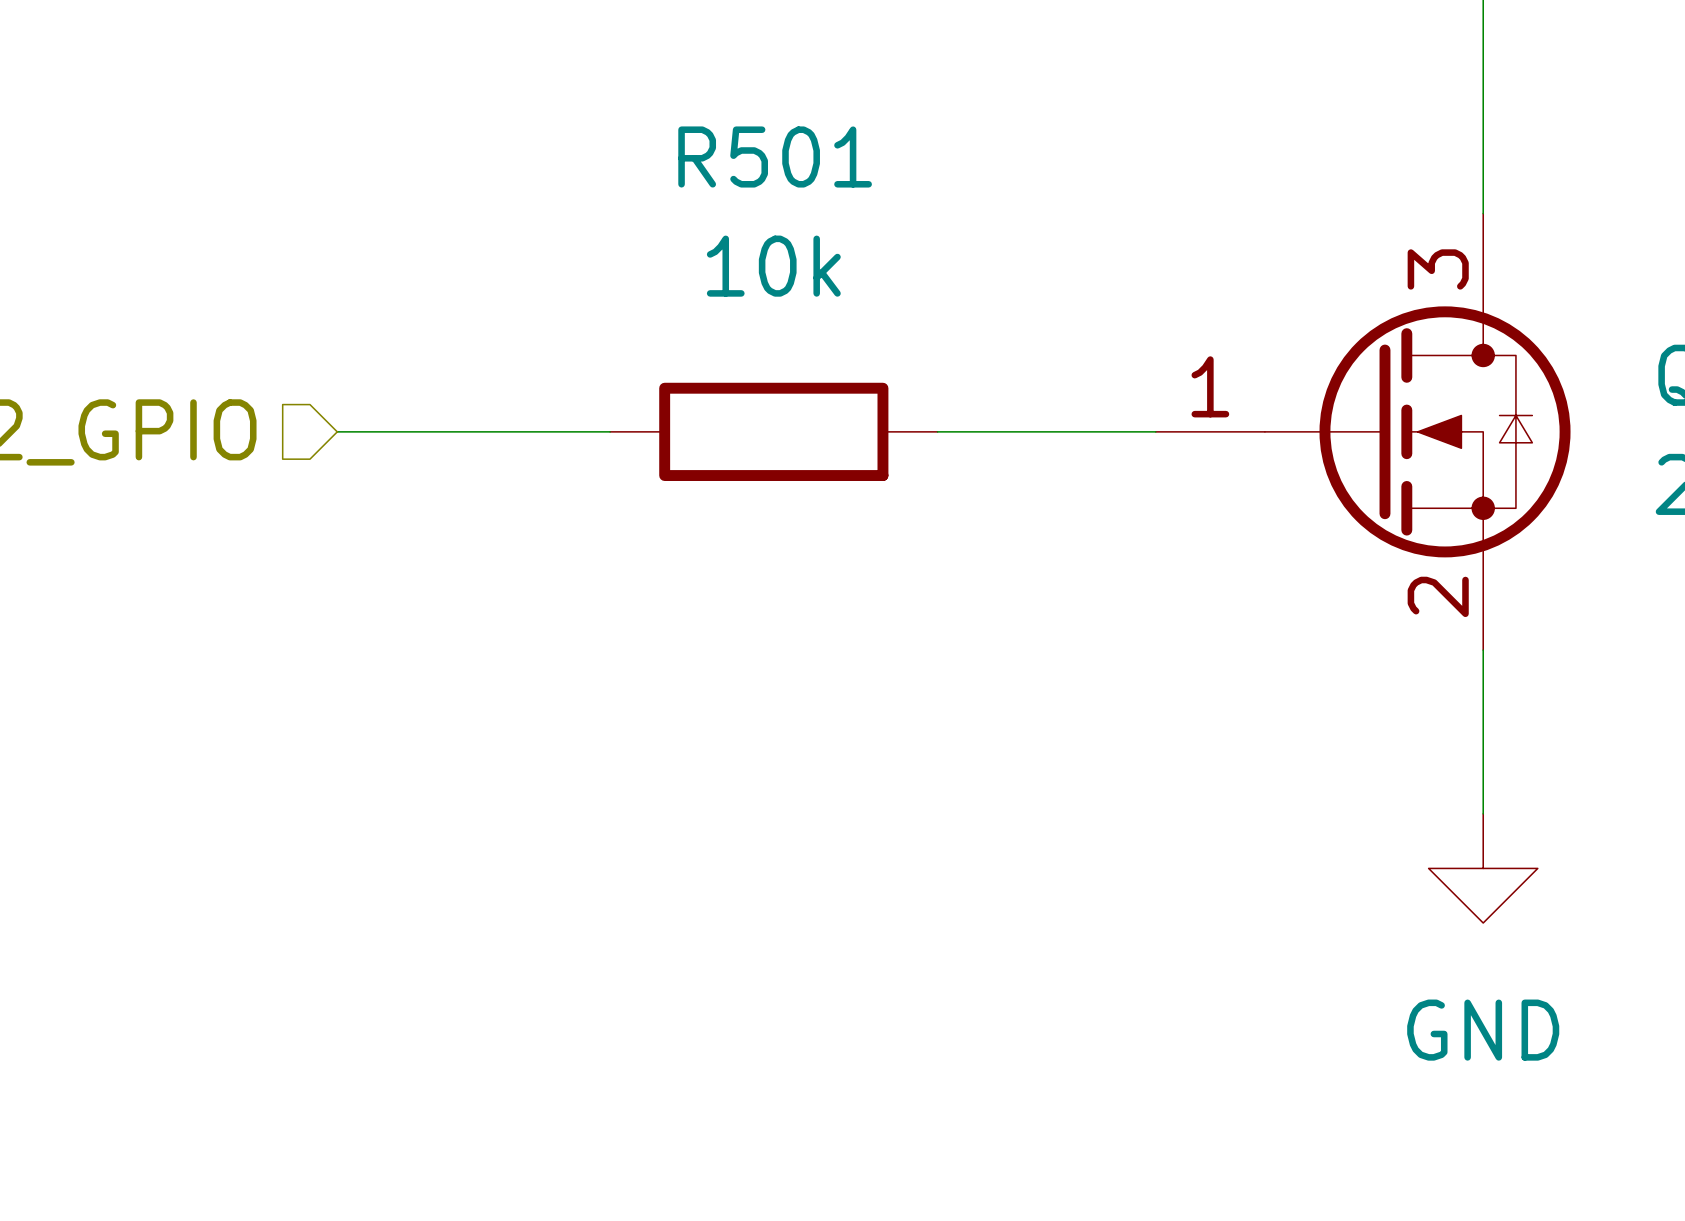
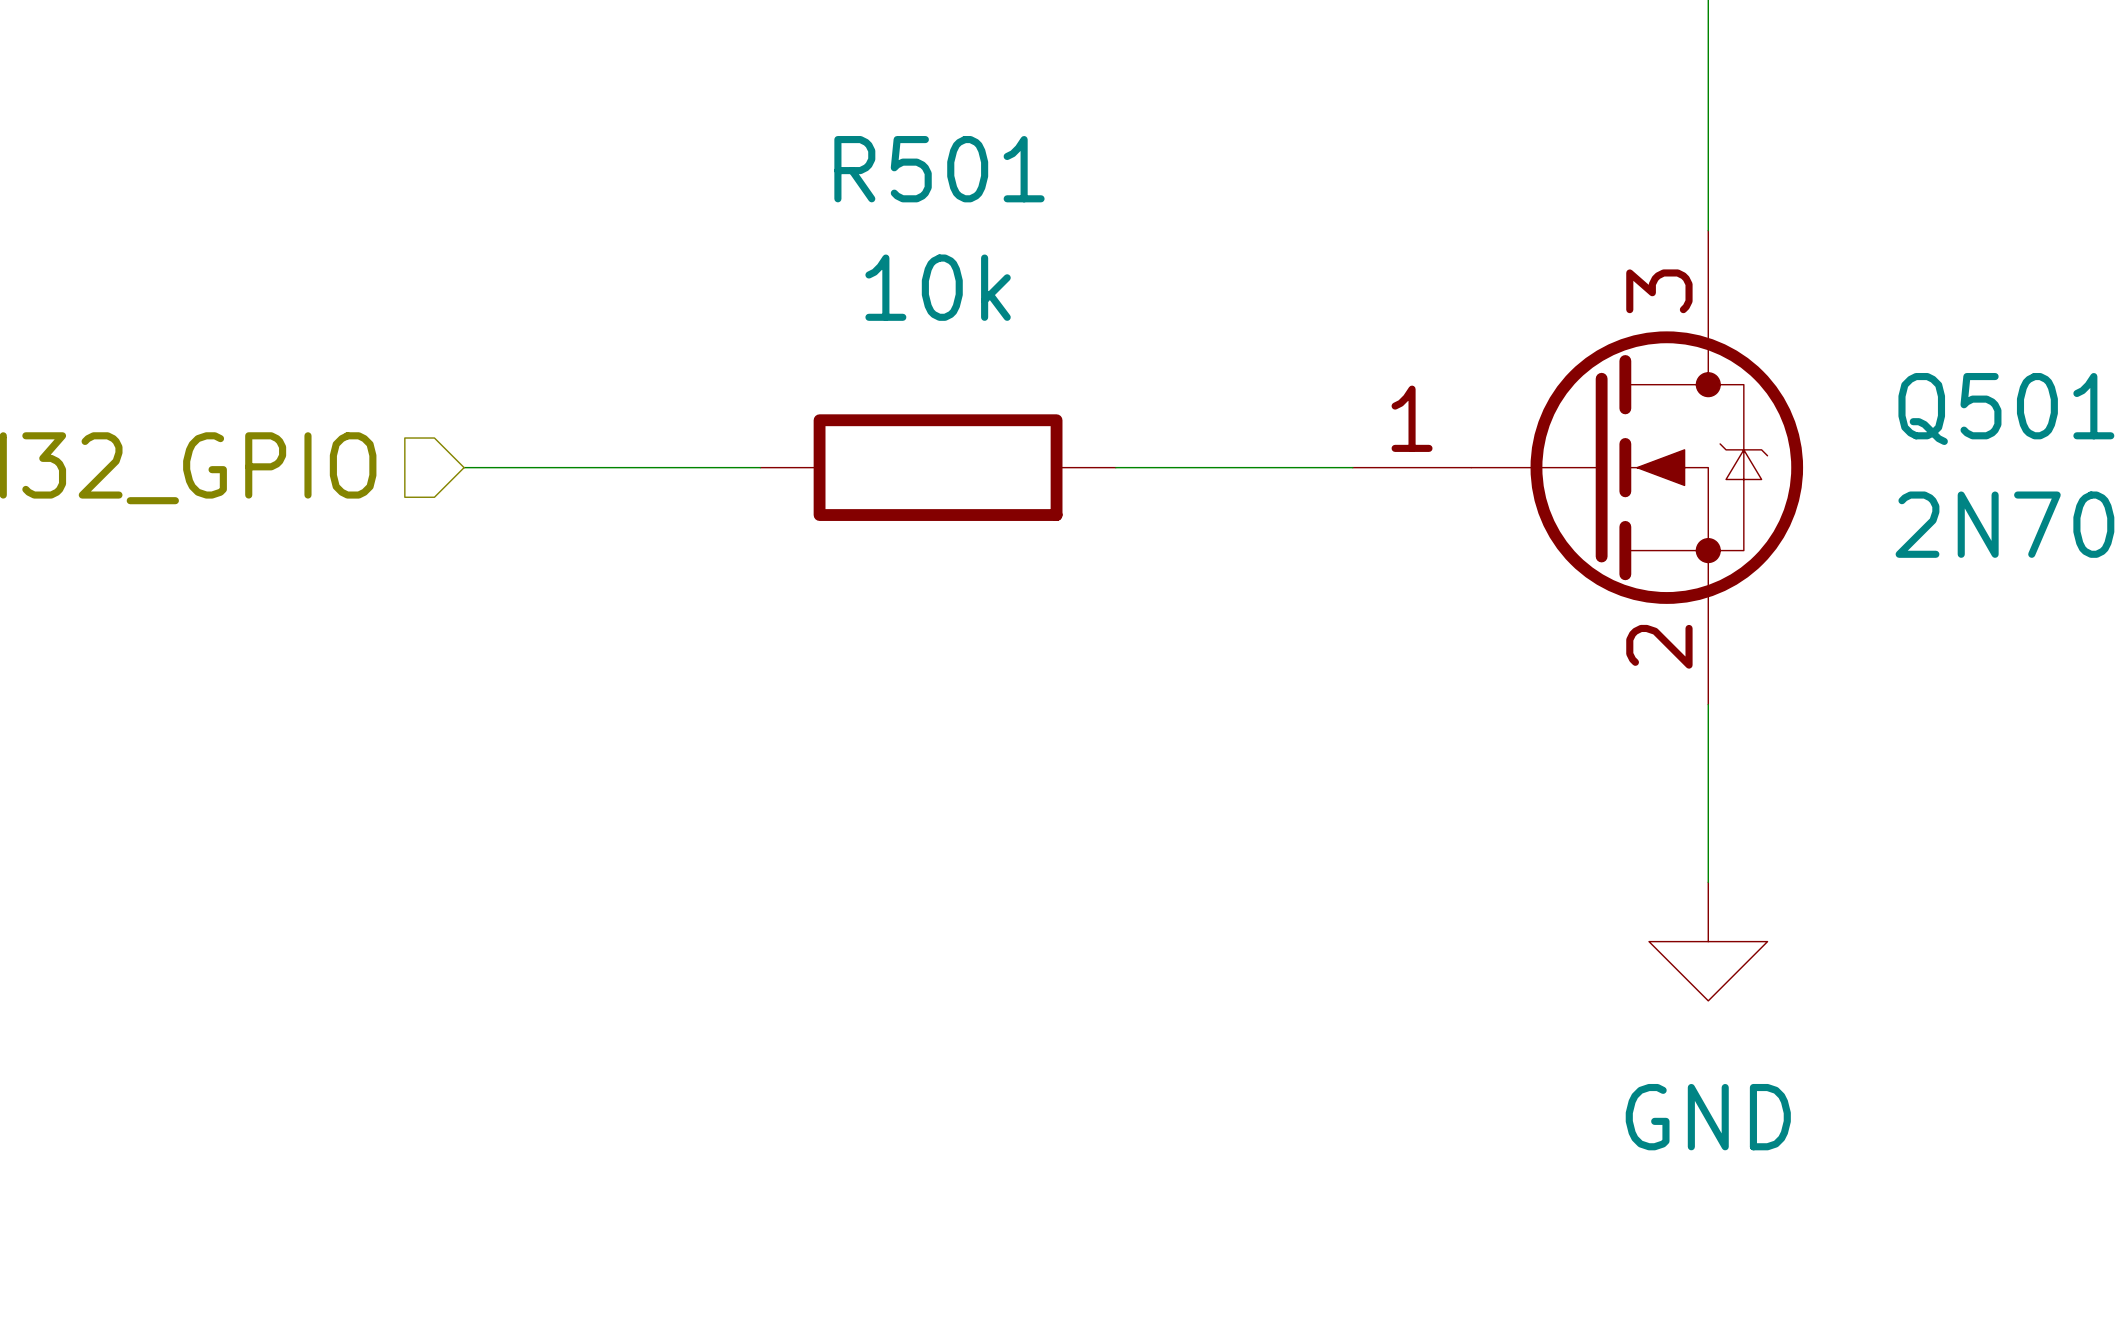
Q501 symbol: [1155, 213, 1571, 651] -> [1352, 230, 1804, 705]

